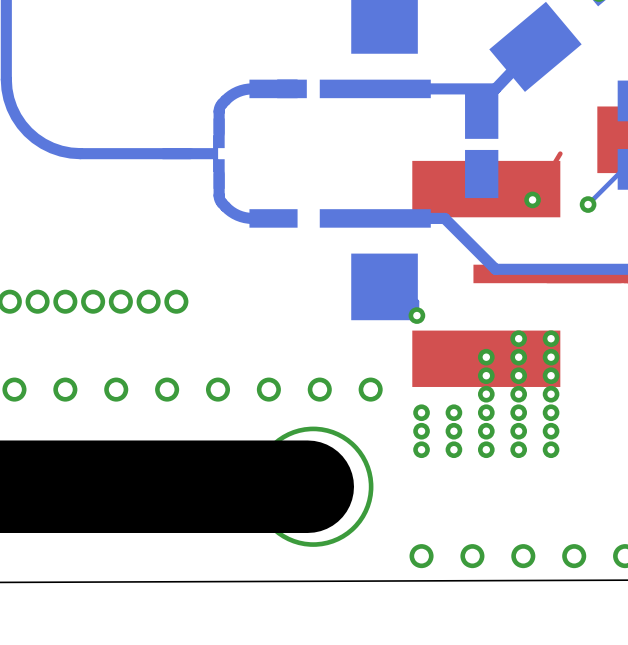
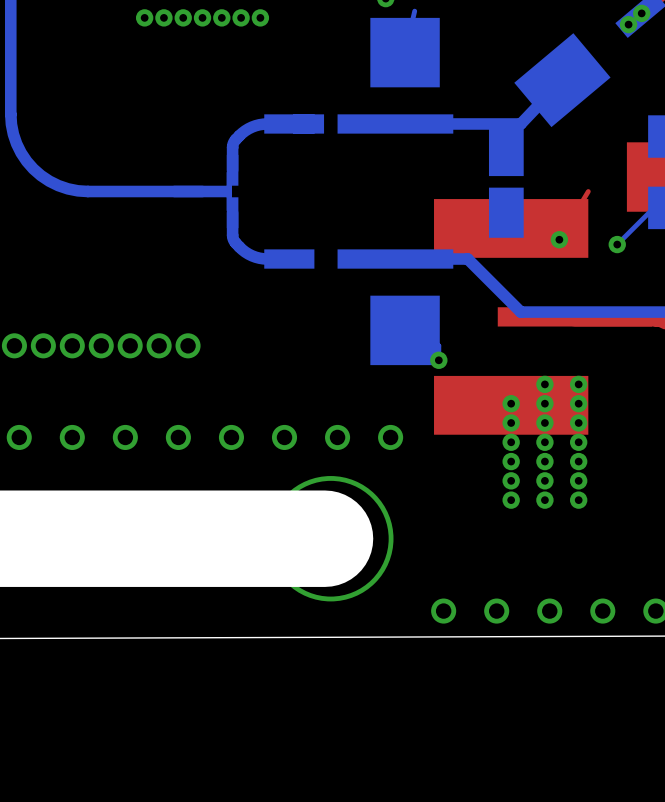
via: (421, 412) -> none
via: (453, 412) -> none
via: (421, 431) -> none
via: (453, 431) -> none
via: (421, 449) -> none
via: (453, 449) -> none

